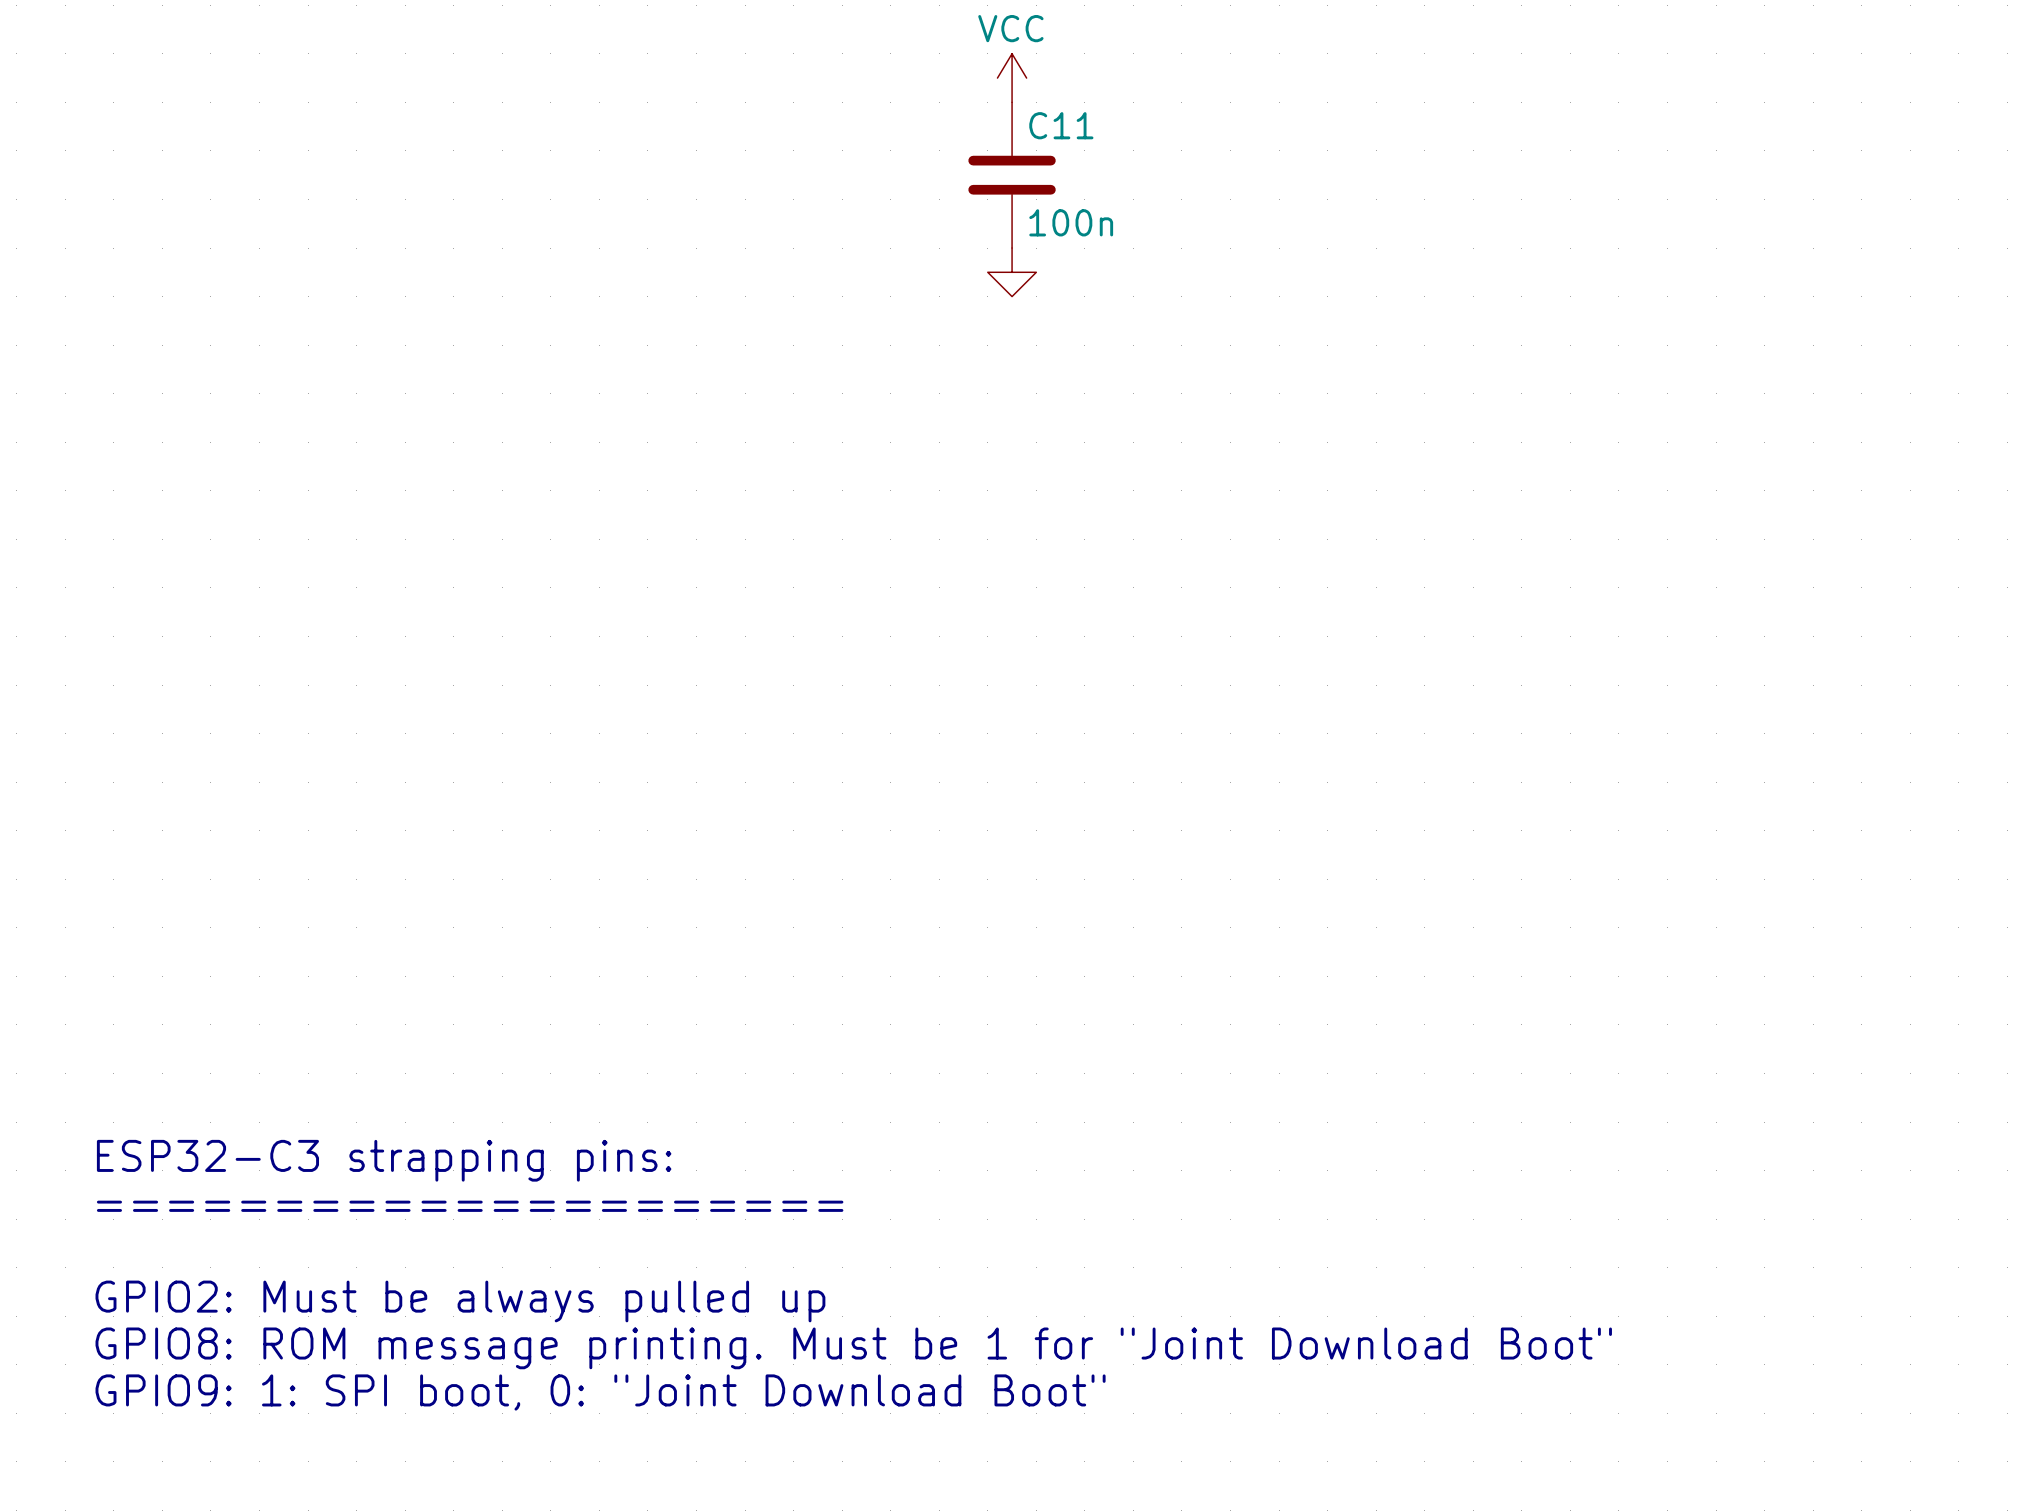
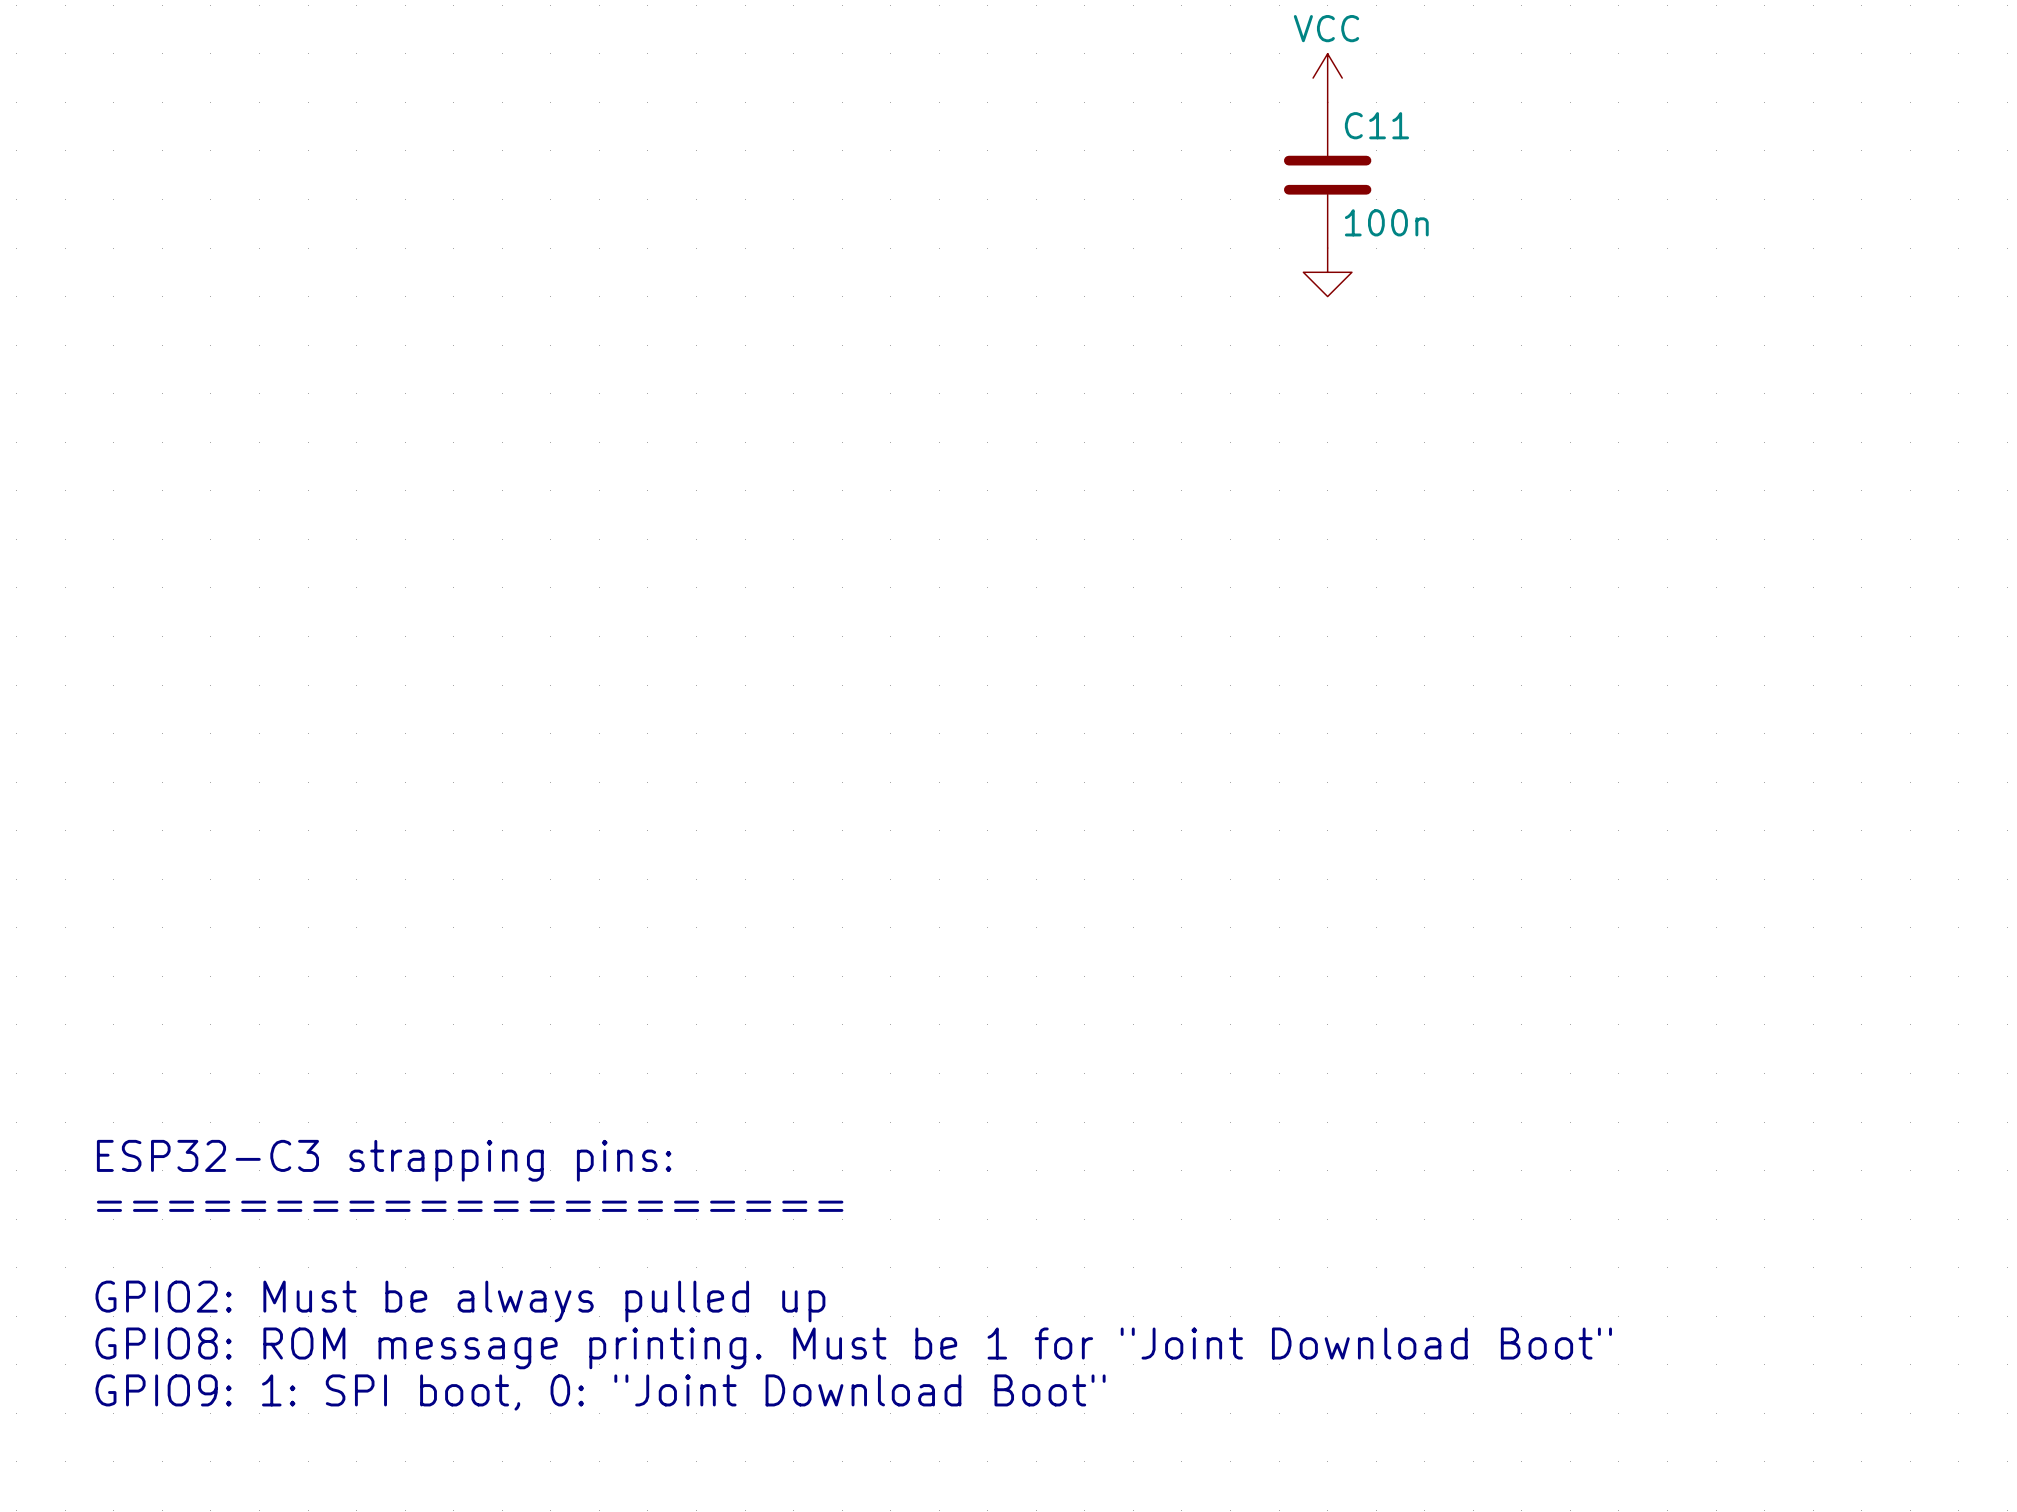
power symbol position: VCC (1012, 78) -> VCC (1327, 78)
C11 position: (1012, 175) -> (1327, 175)
power symbol: (1012, 272) -> none
power symbol: none -> (1327, 272)

